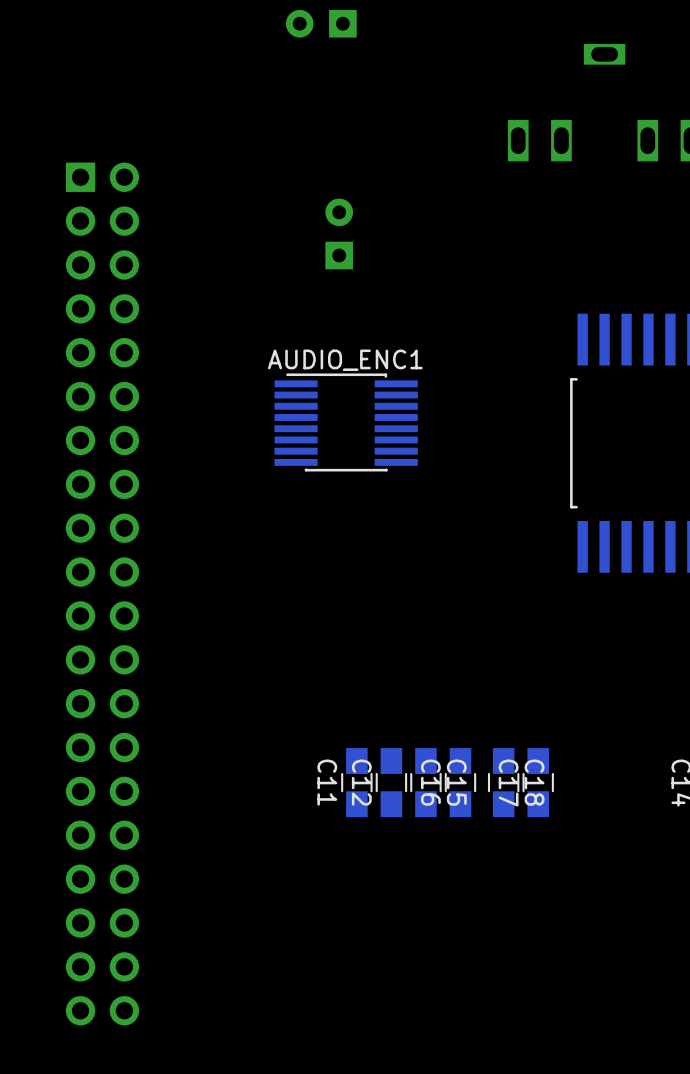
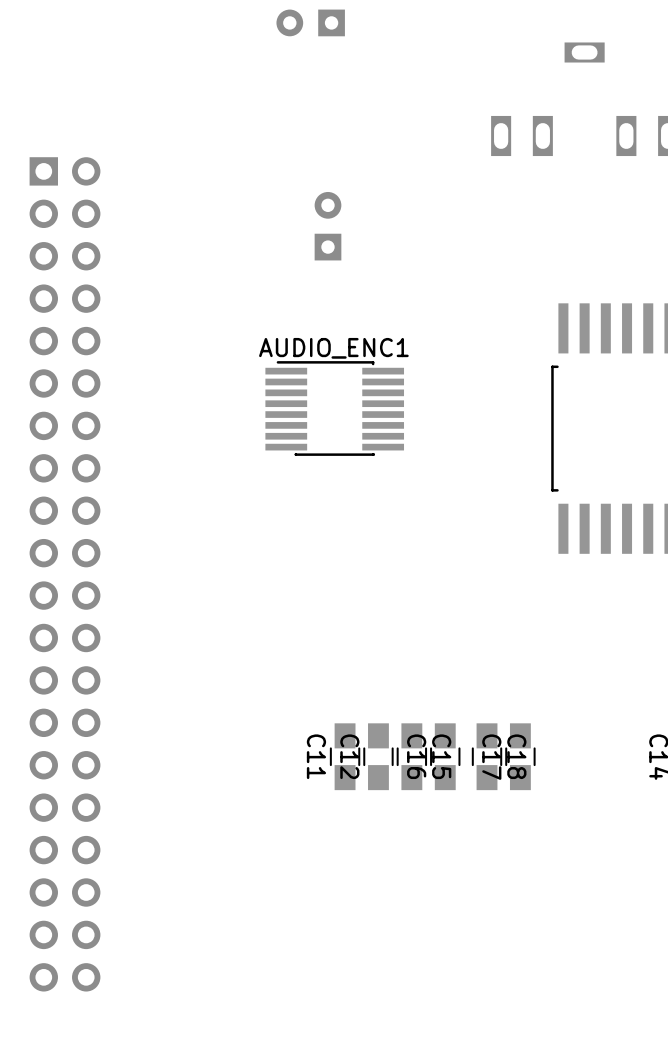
part position: (102, 594) -> (65, 574)

